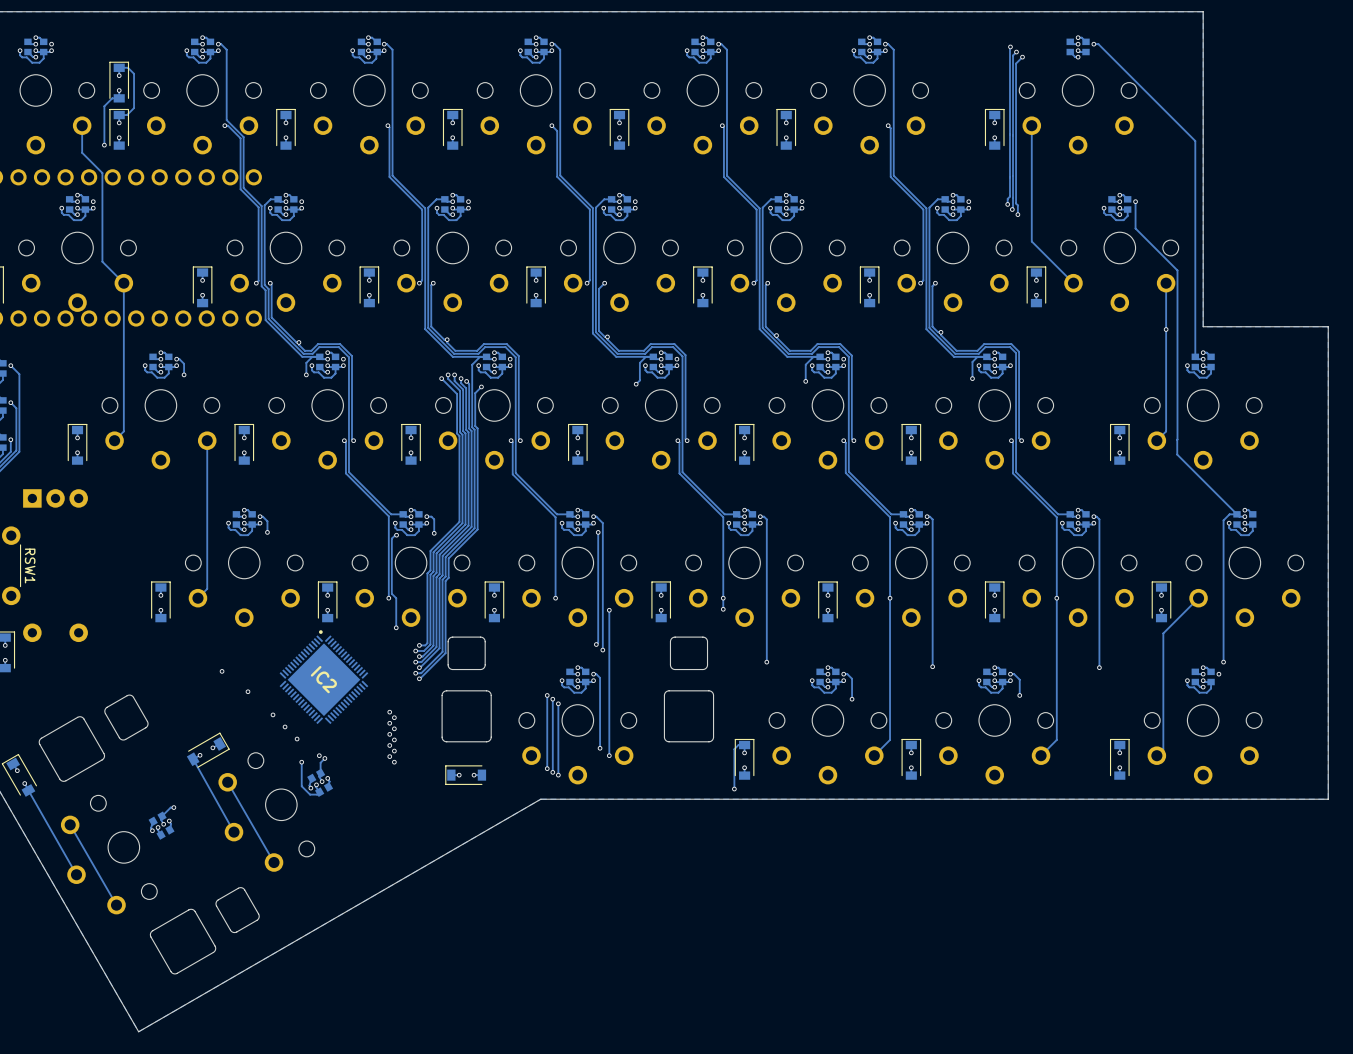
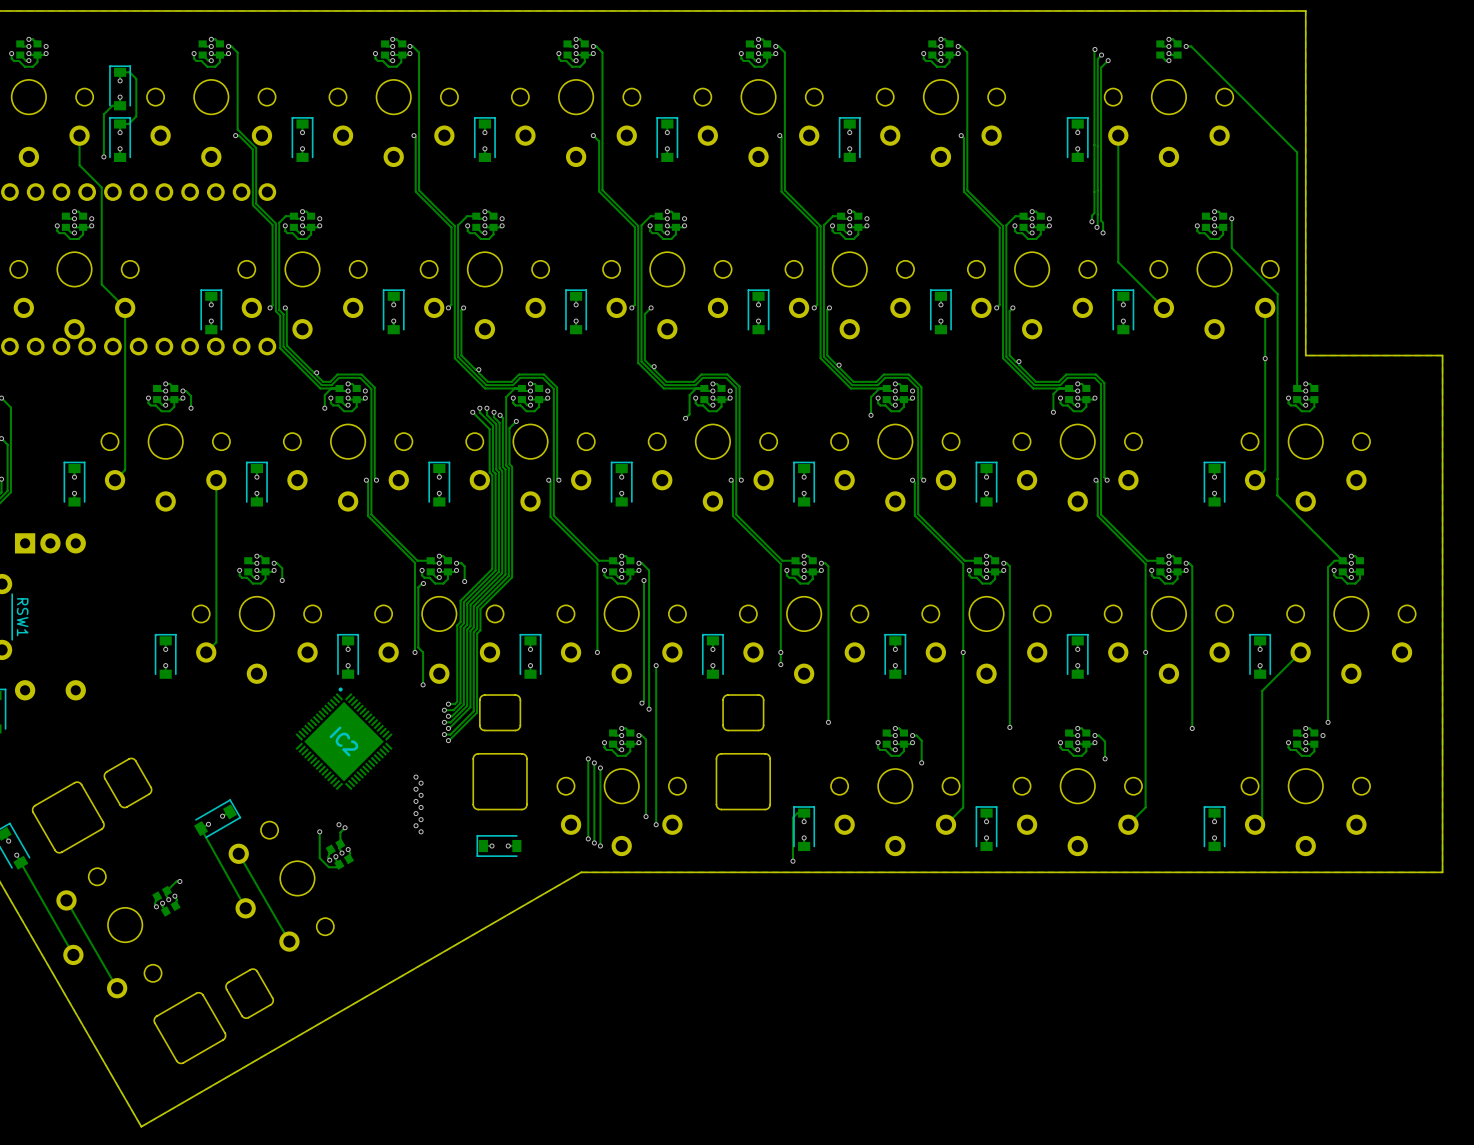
via: (222, 671) -> none
via: (247, 691) -> none
via: (273, 714) -> none
via: (285, 726) -> none
via: (297, 739) -> none

